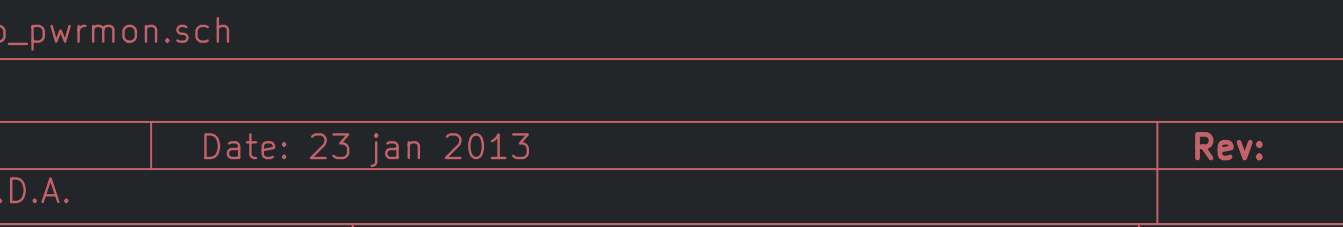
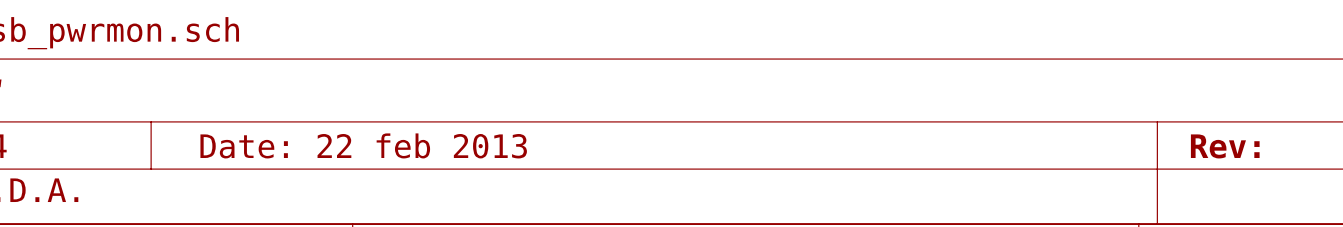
title block: Date: 23 jan 2013 (366, 150) -> Date: 22 feb 2013 (363, 145)

